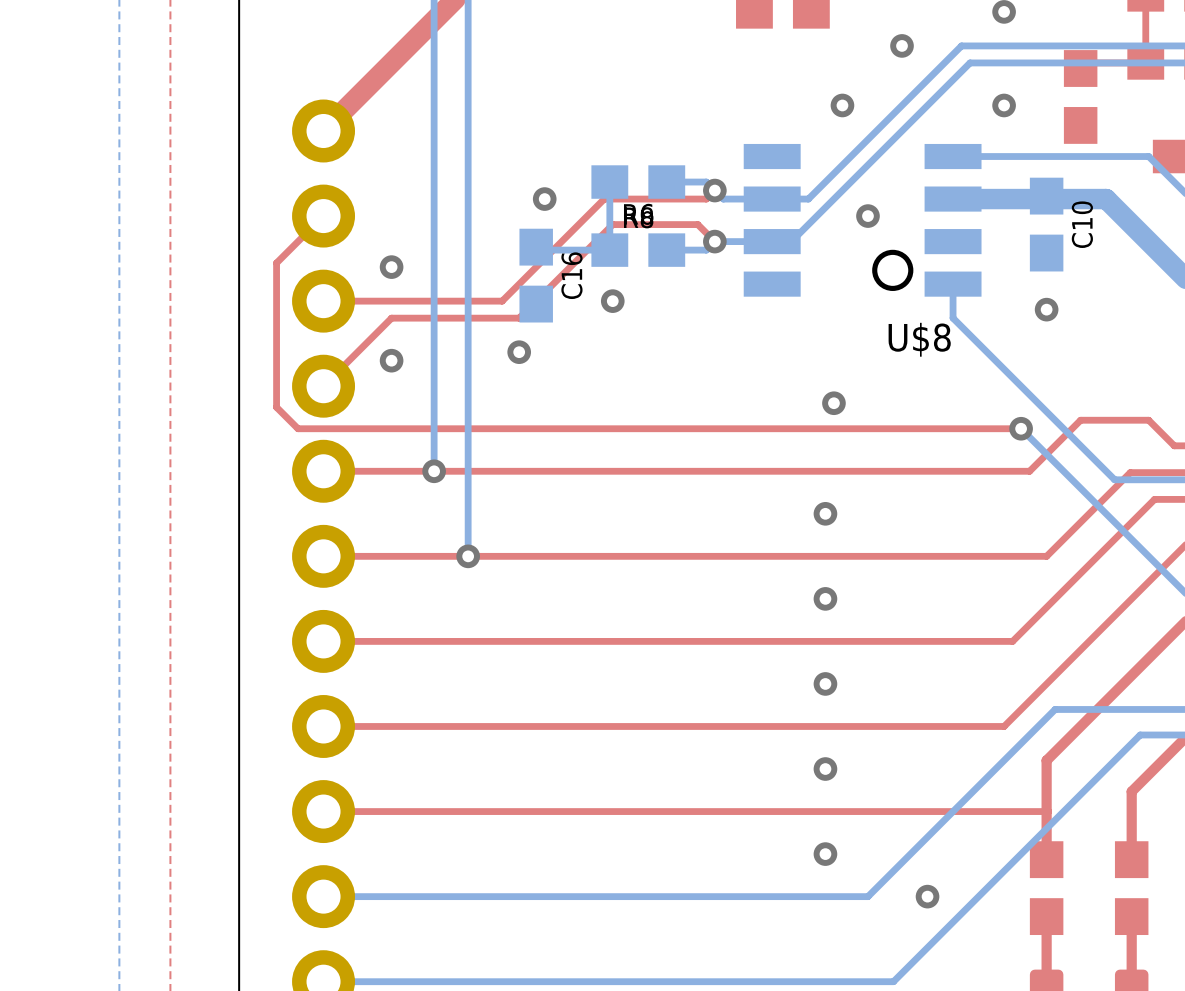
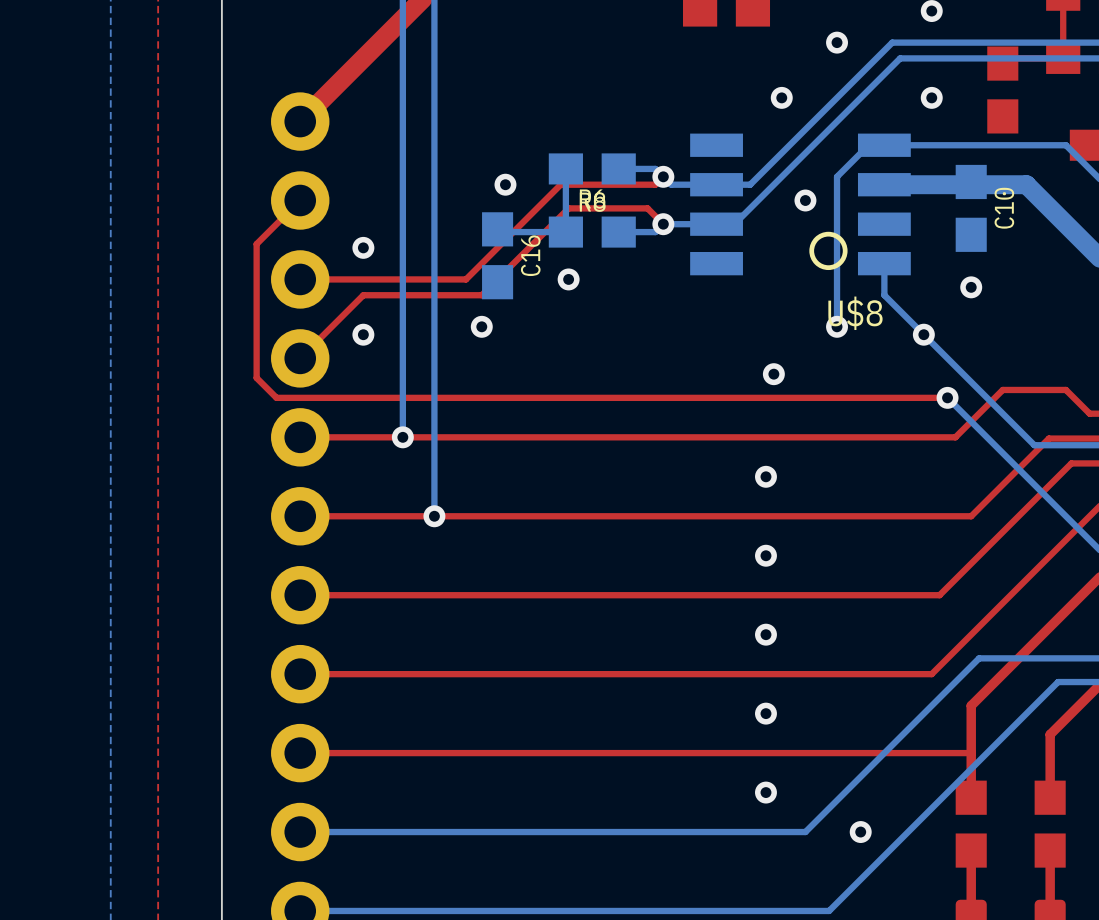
bottom track: none -> (884, 145) (868, 145) (837, 176) (837, 326)
via: none -> (837, 326)
via: none -> (923, 334)

